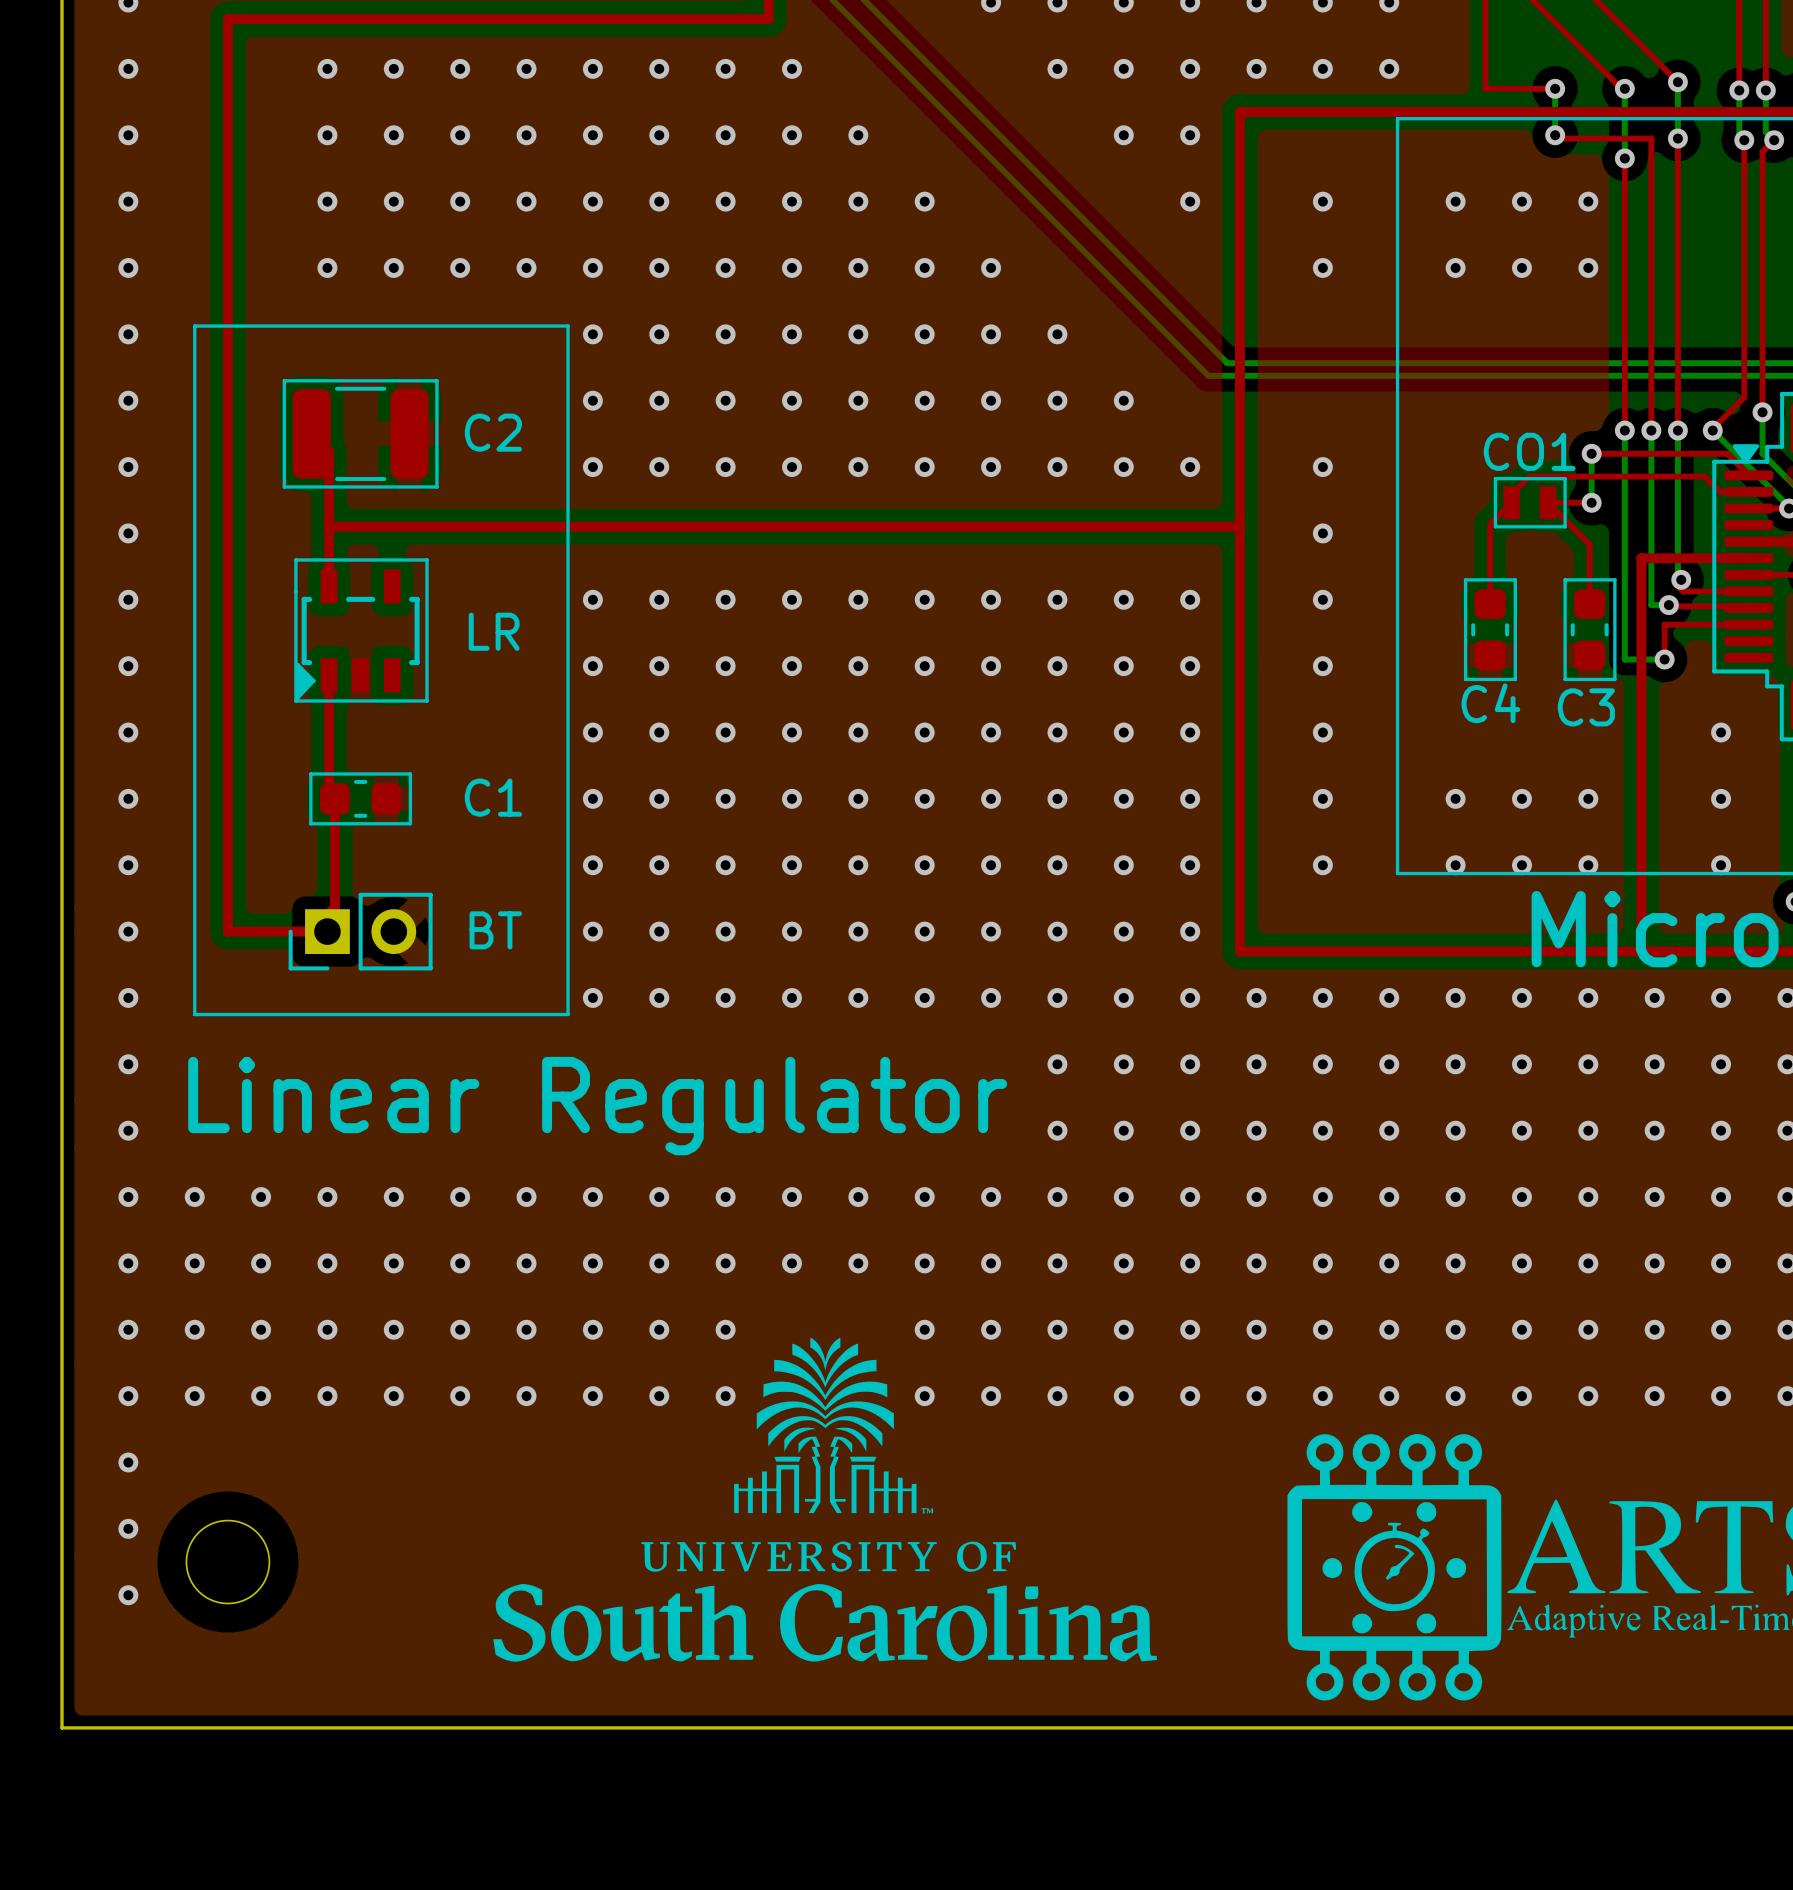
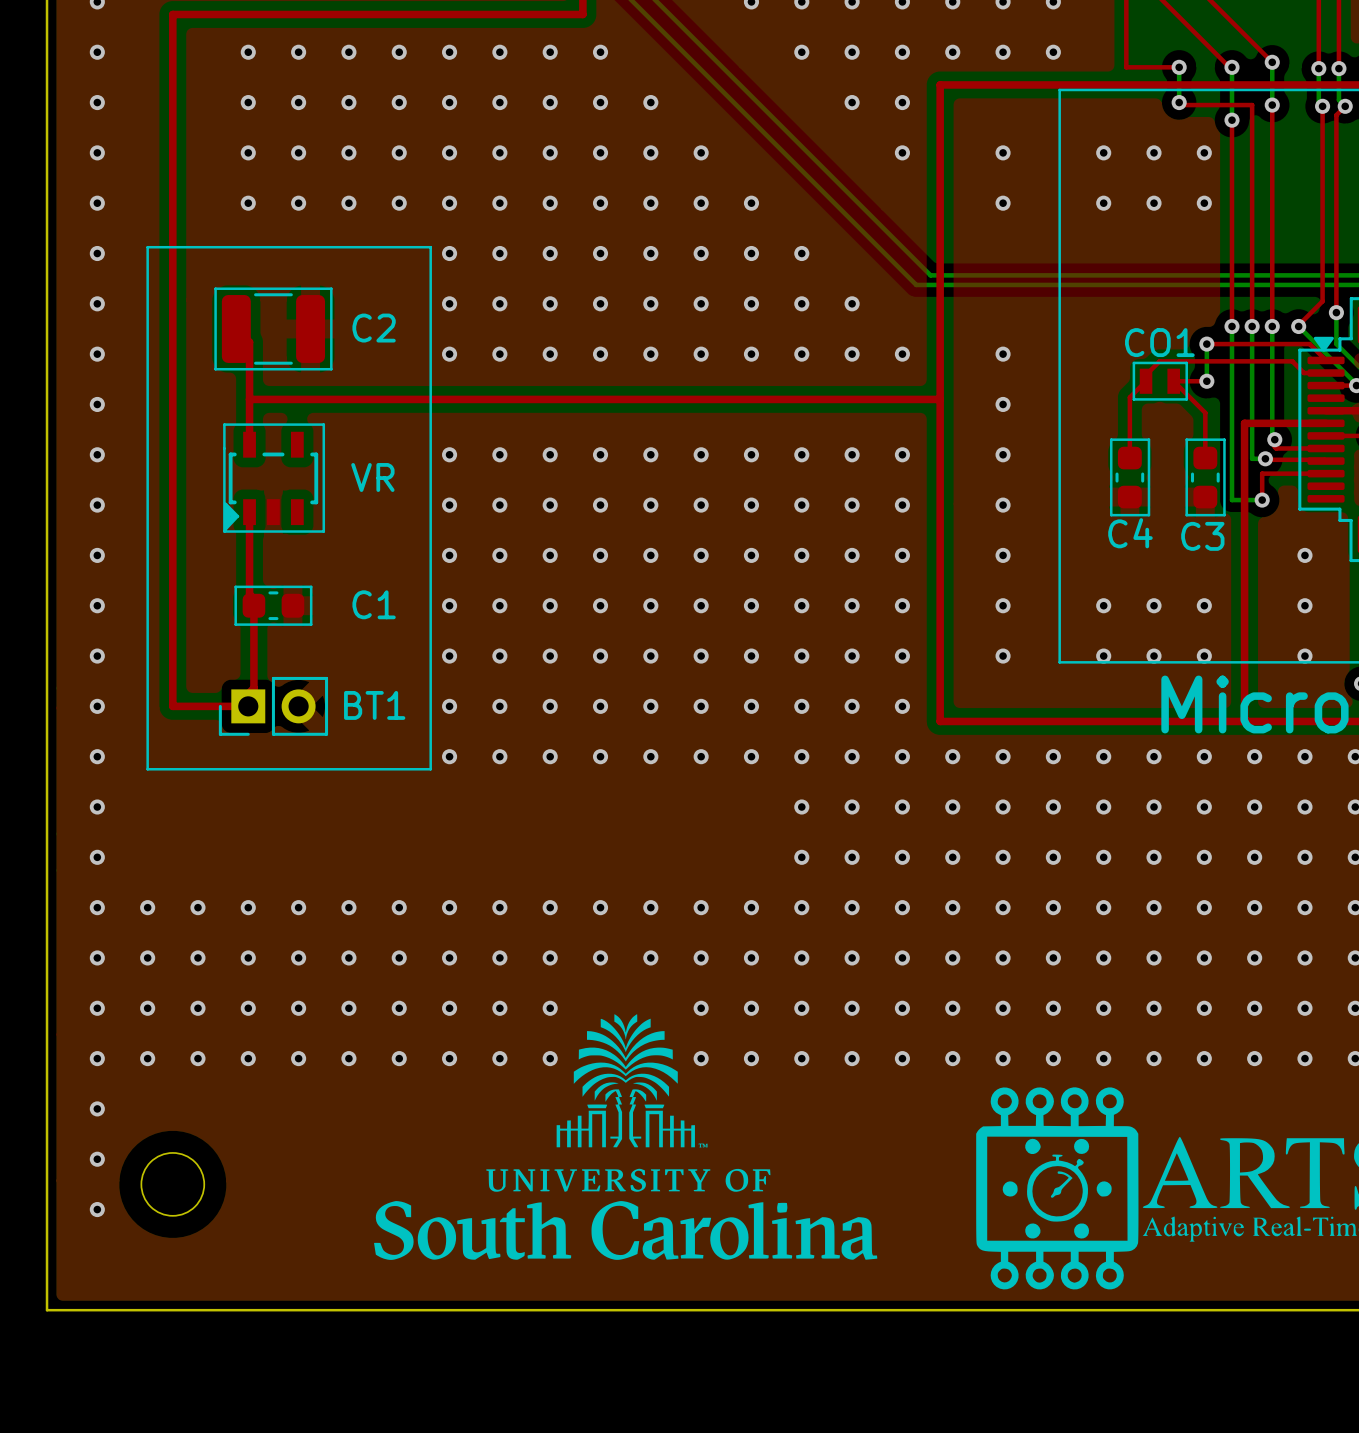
Linear Regulator text: none -> VR (372, 477)
text: LR (494, 631) -> none
BT name: BT (495, 930) -> BT1 (374, 705)
Linear Regulator name: Linear Regulator (597, 1106) -> none

